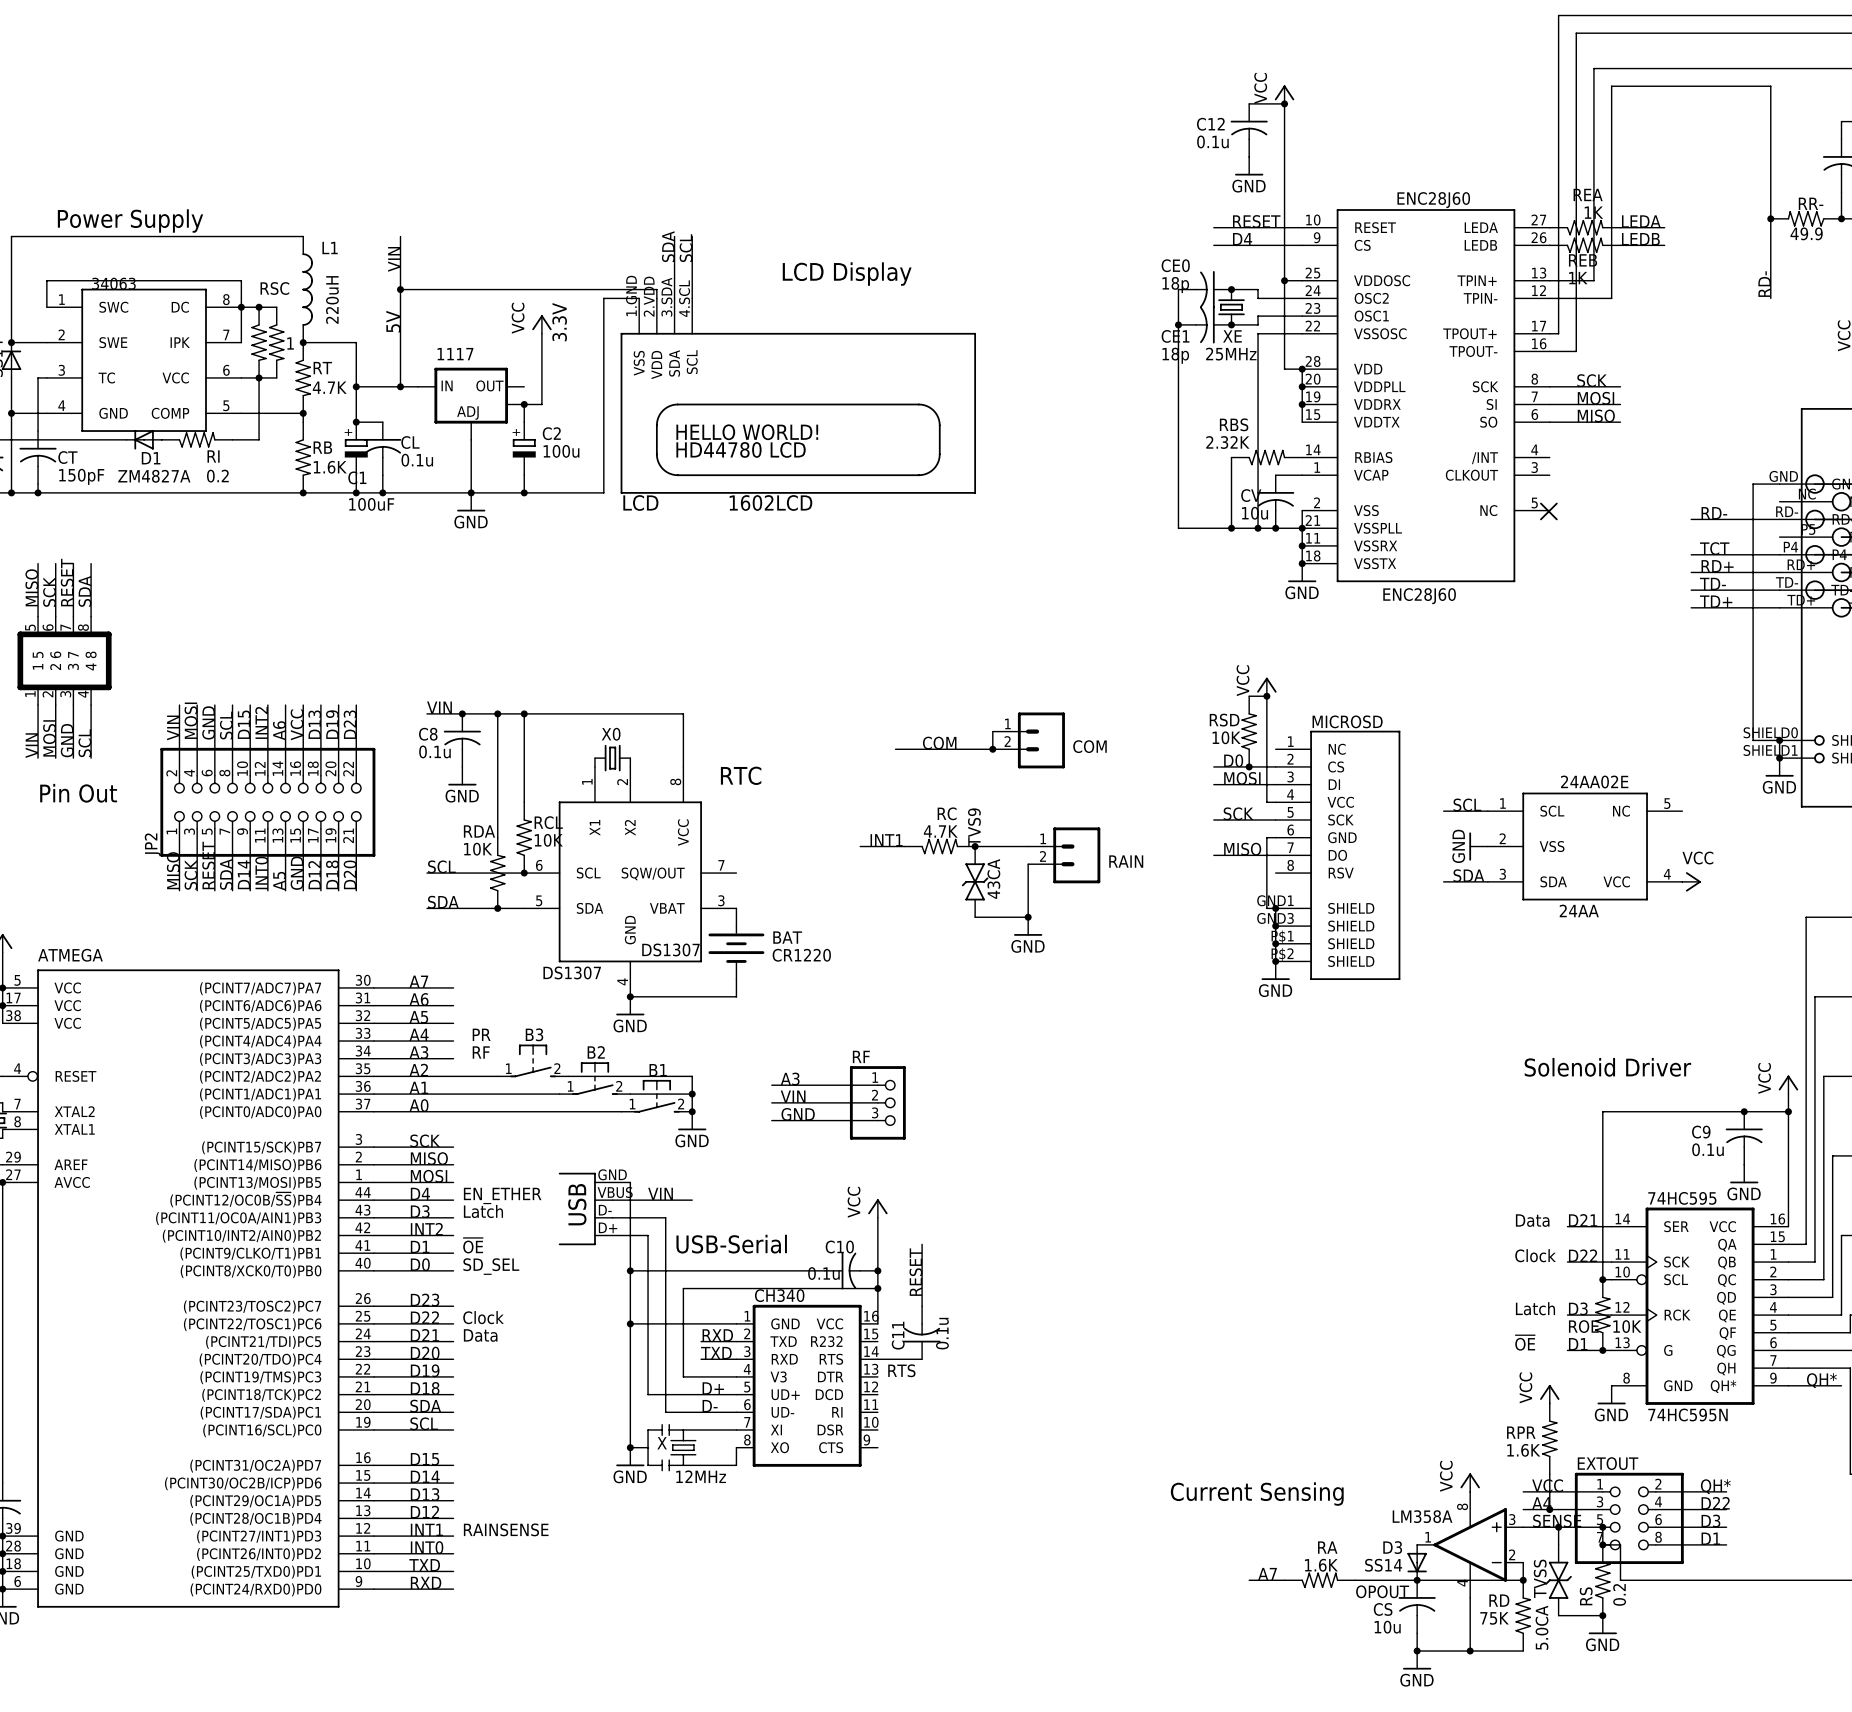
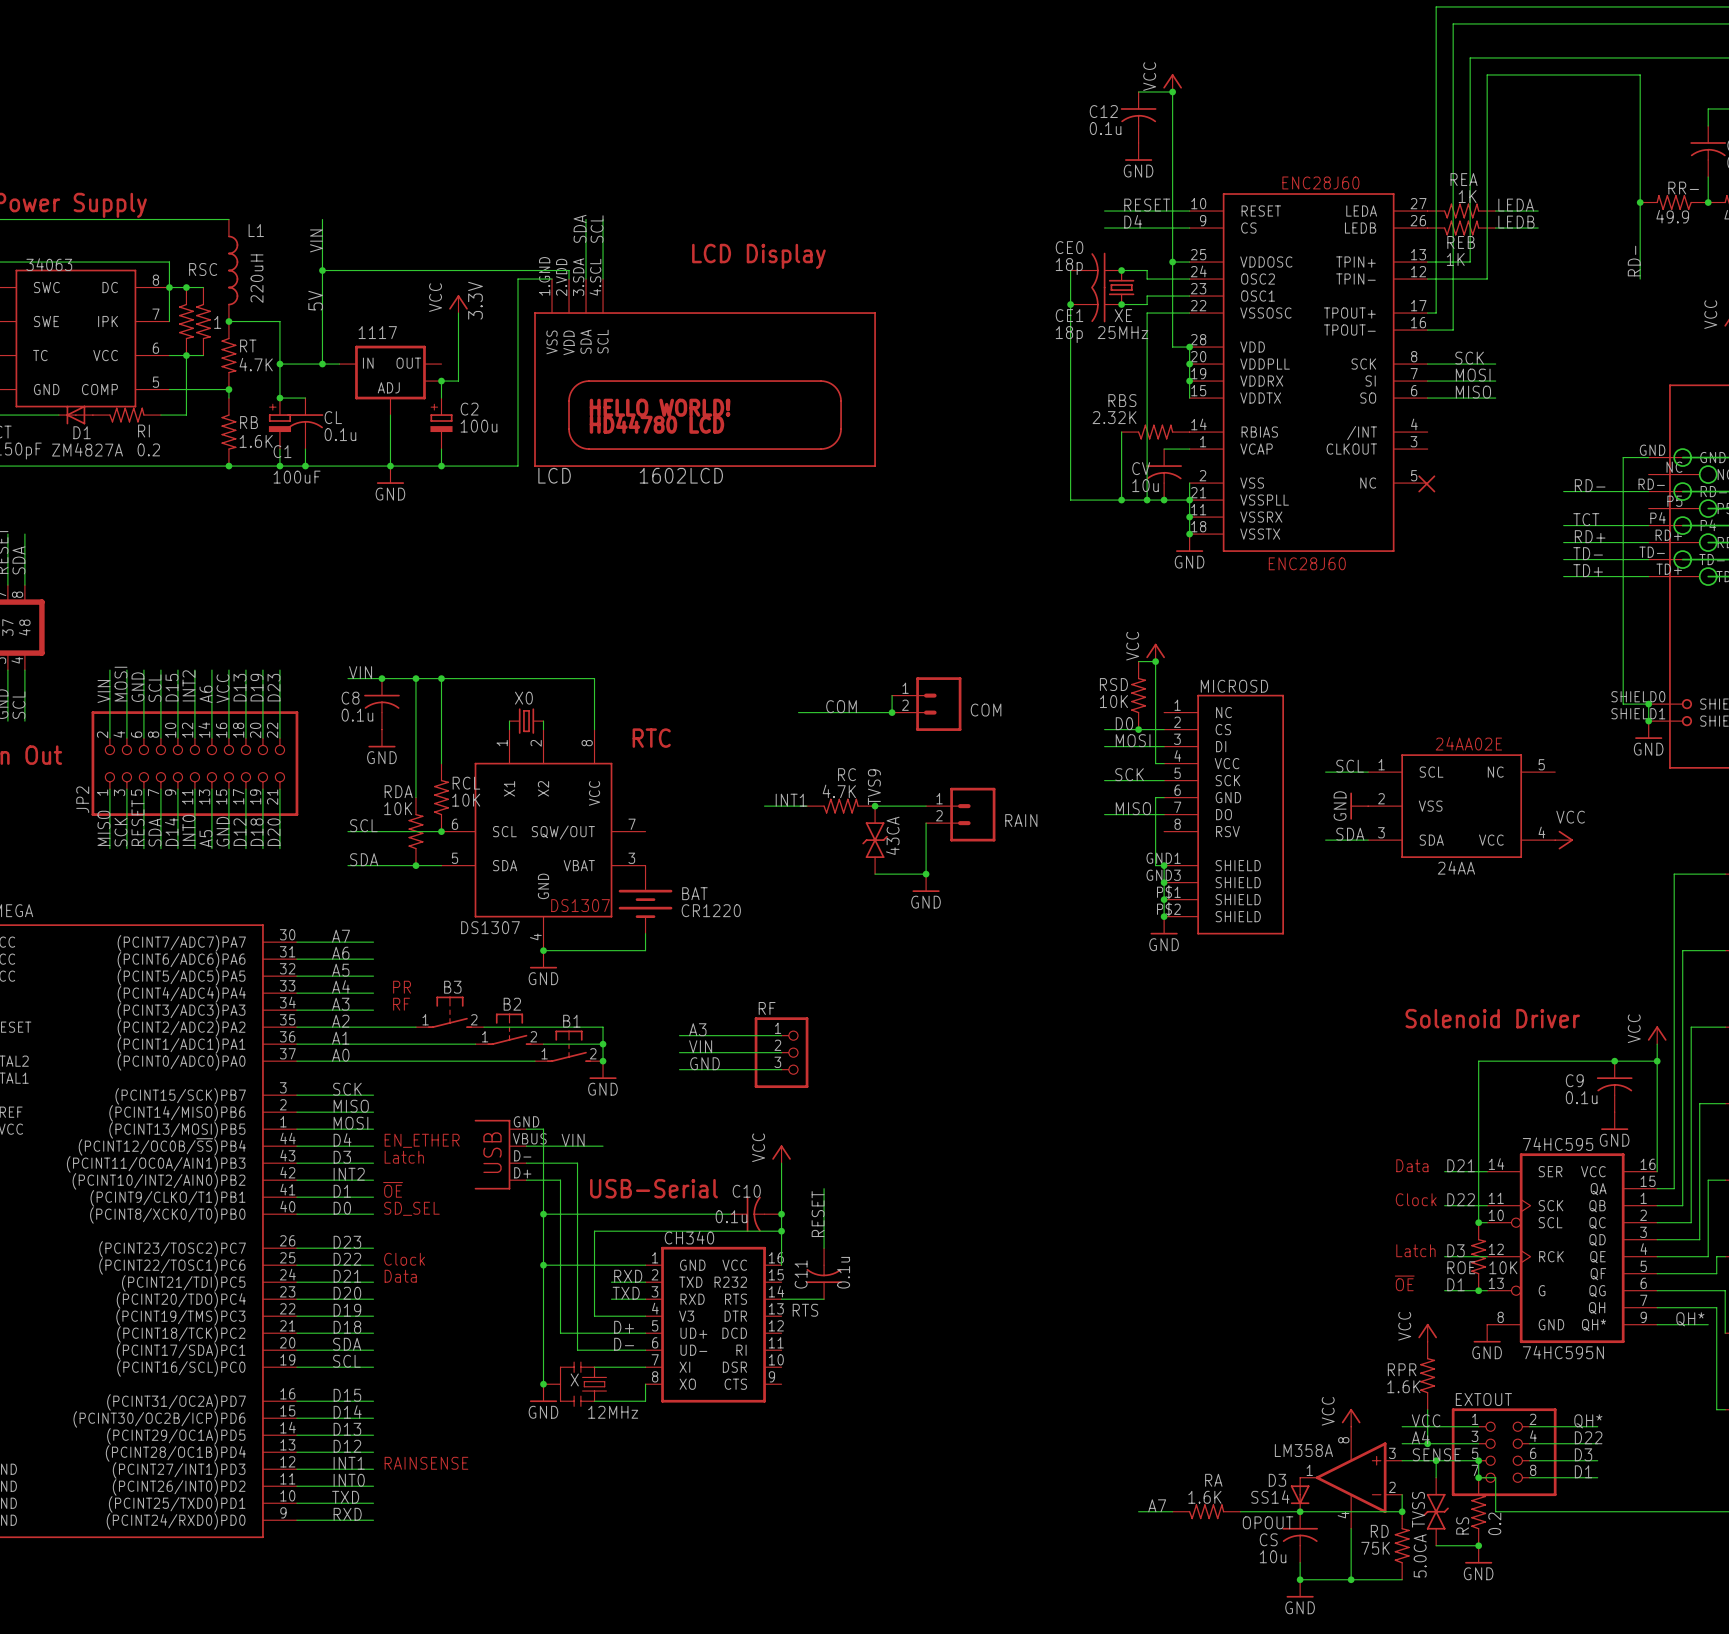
text: Current Sensing (1257, 1494) -> none

